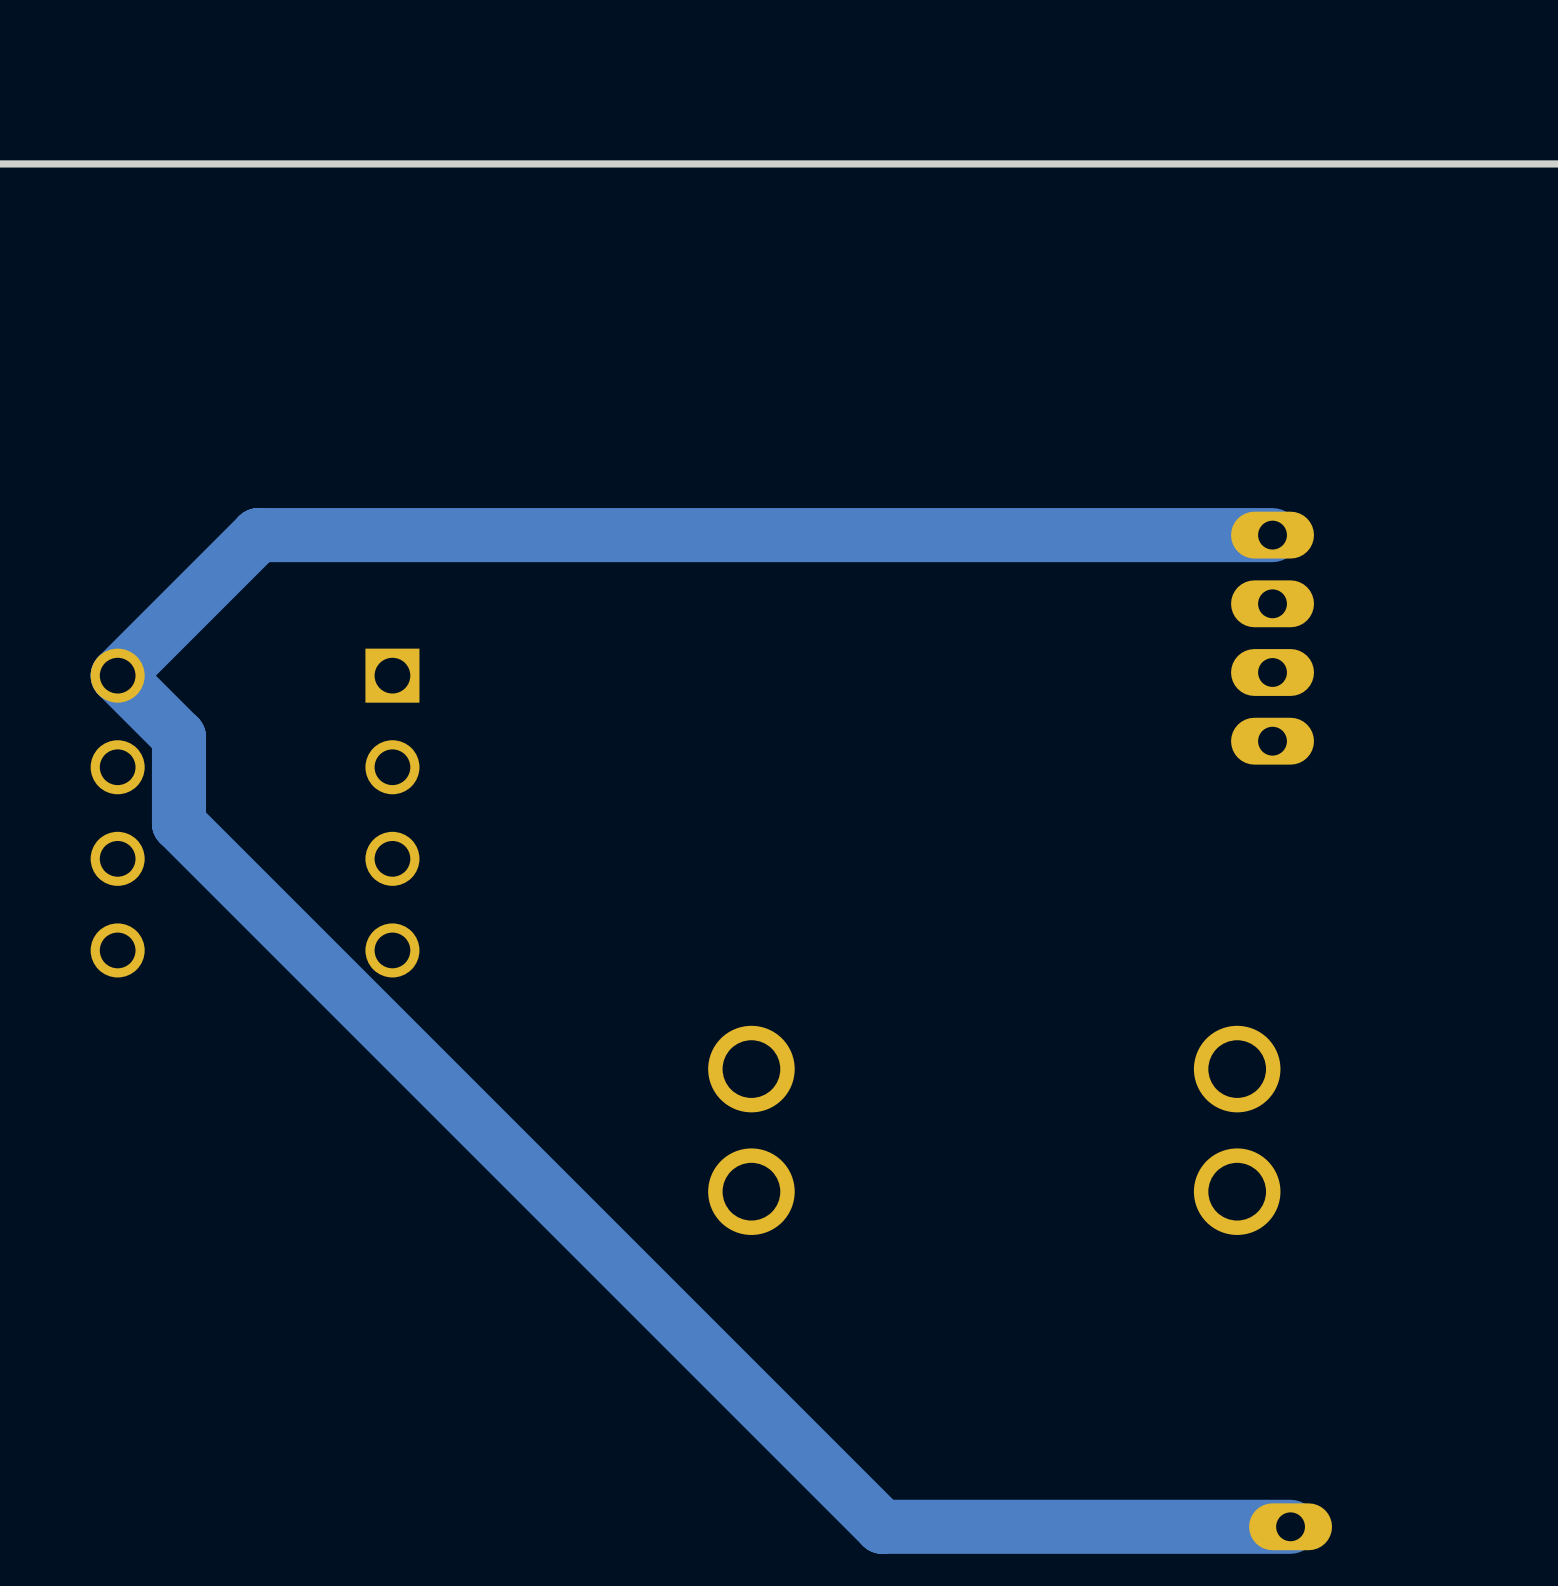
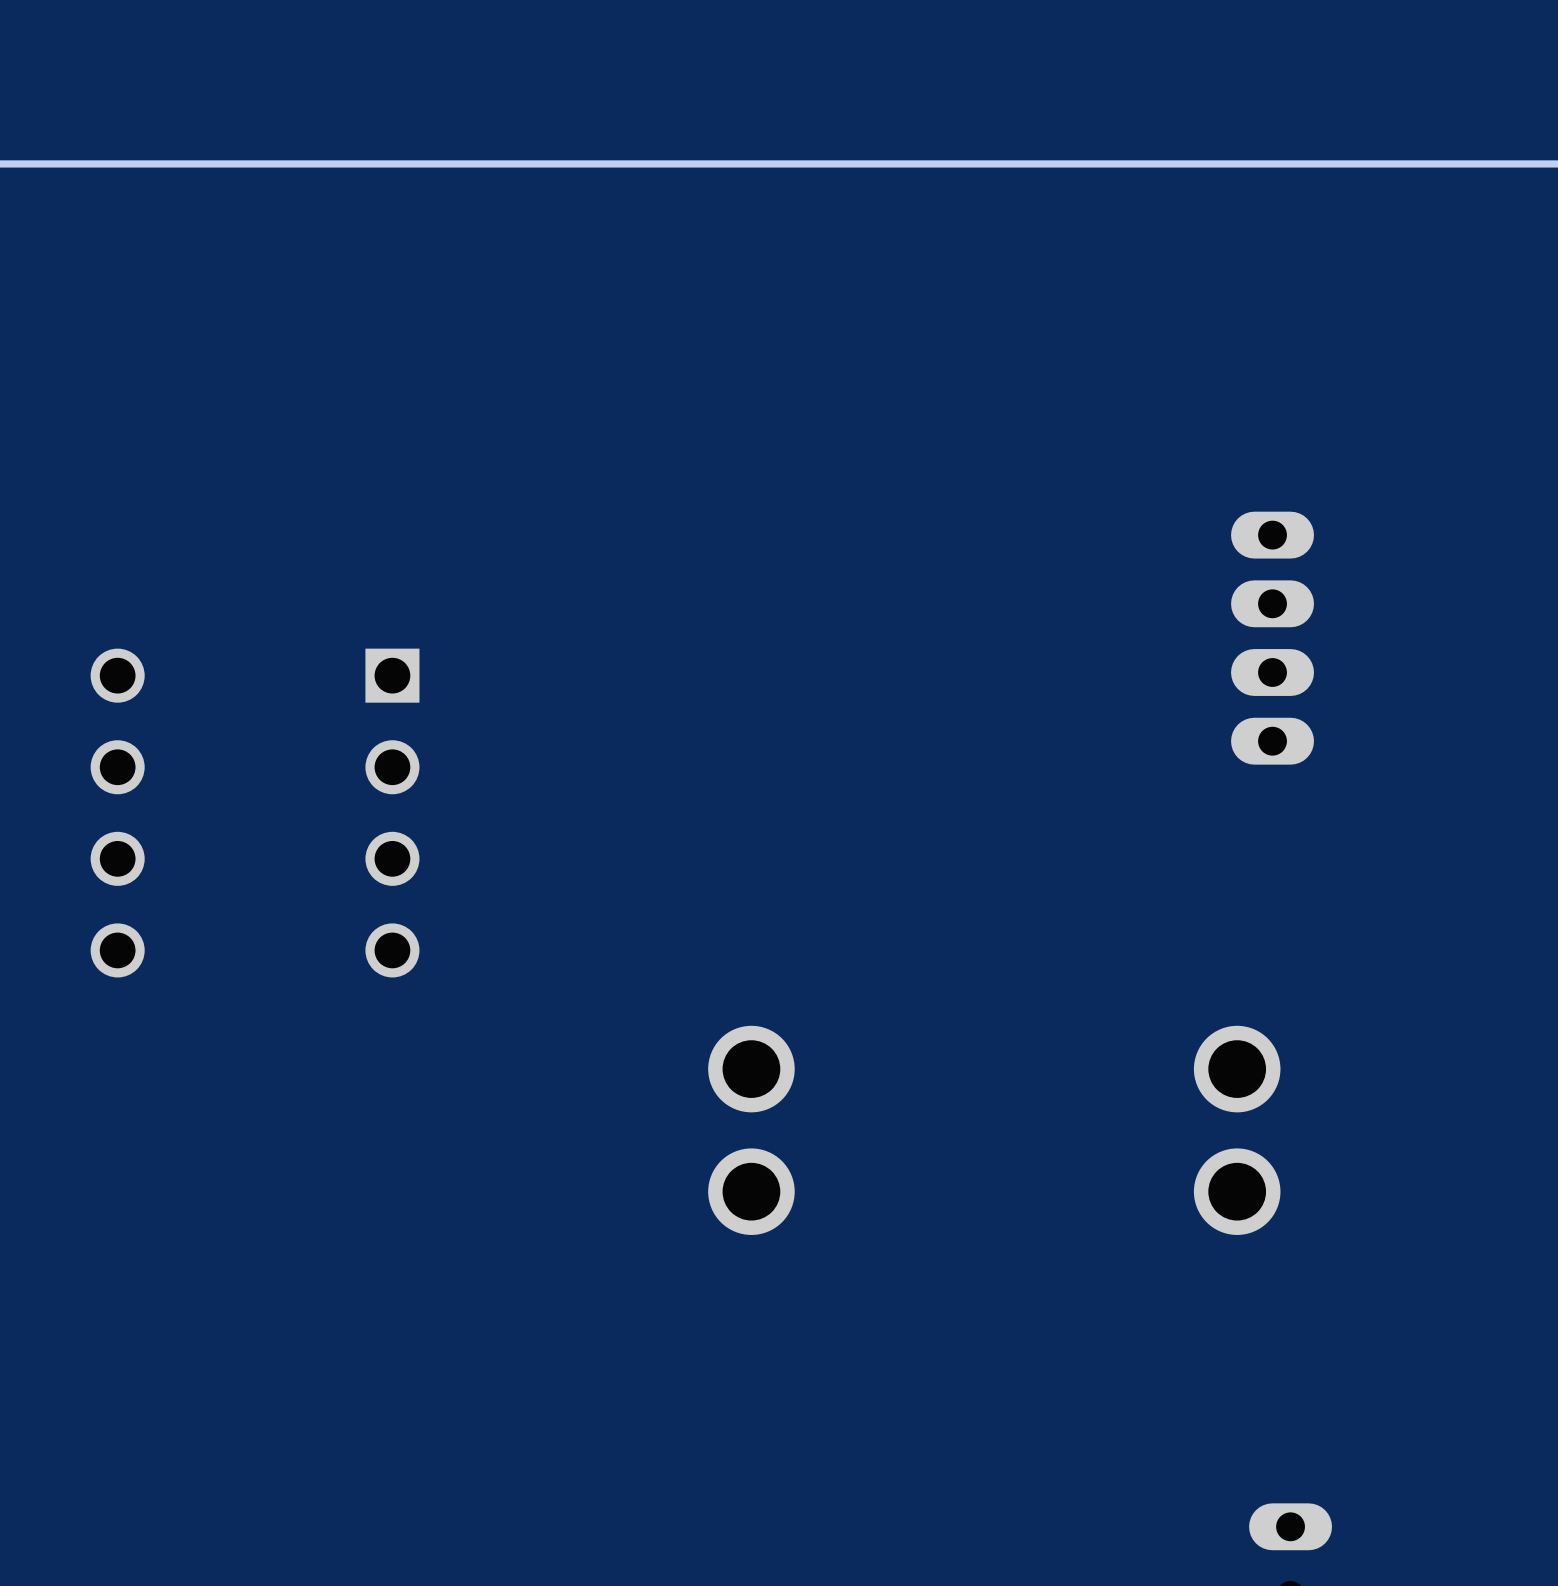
track: (1272, 535) (258, 535) (117, 675) (178, 736) (178, 823) (882, 1526) (1290, 1526) -> none

